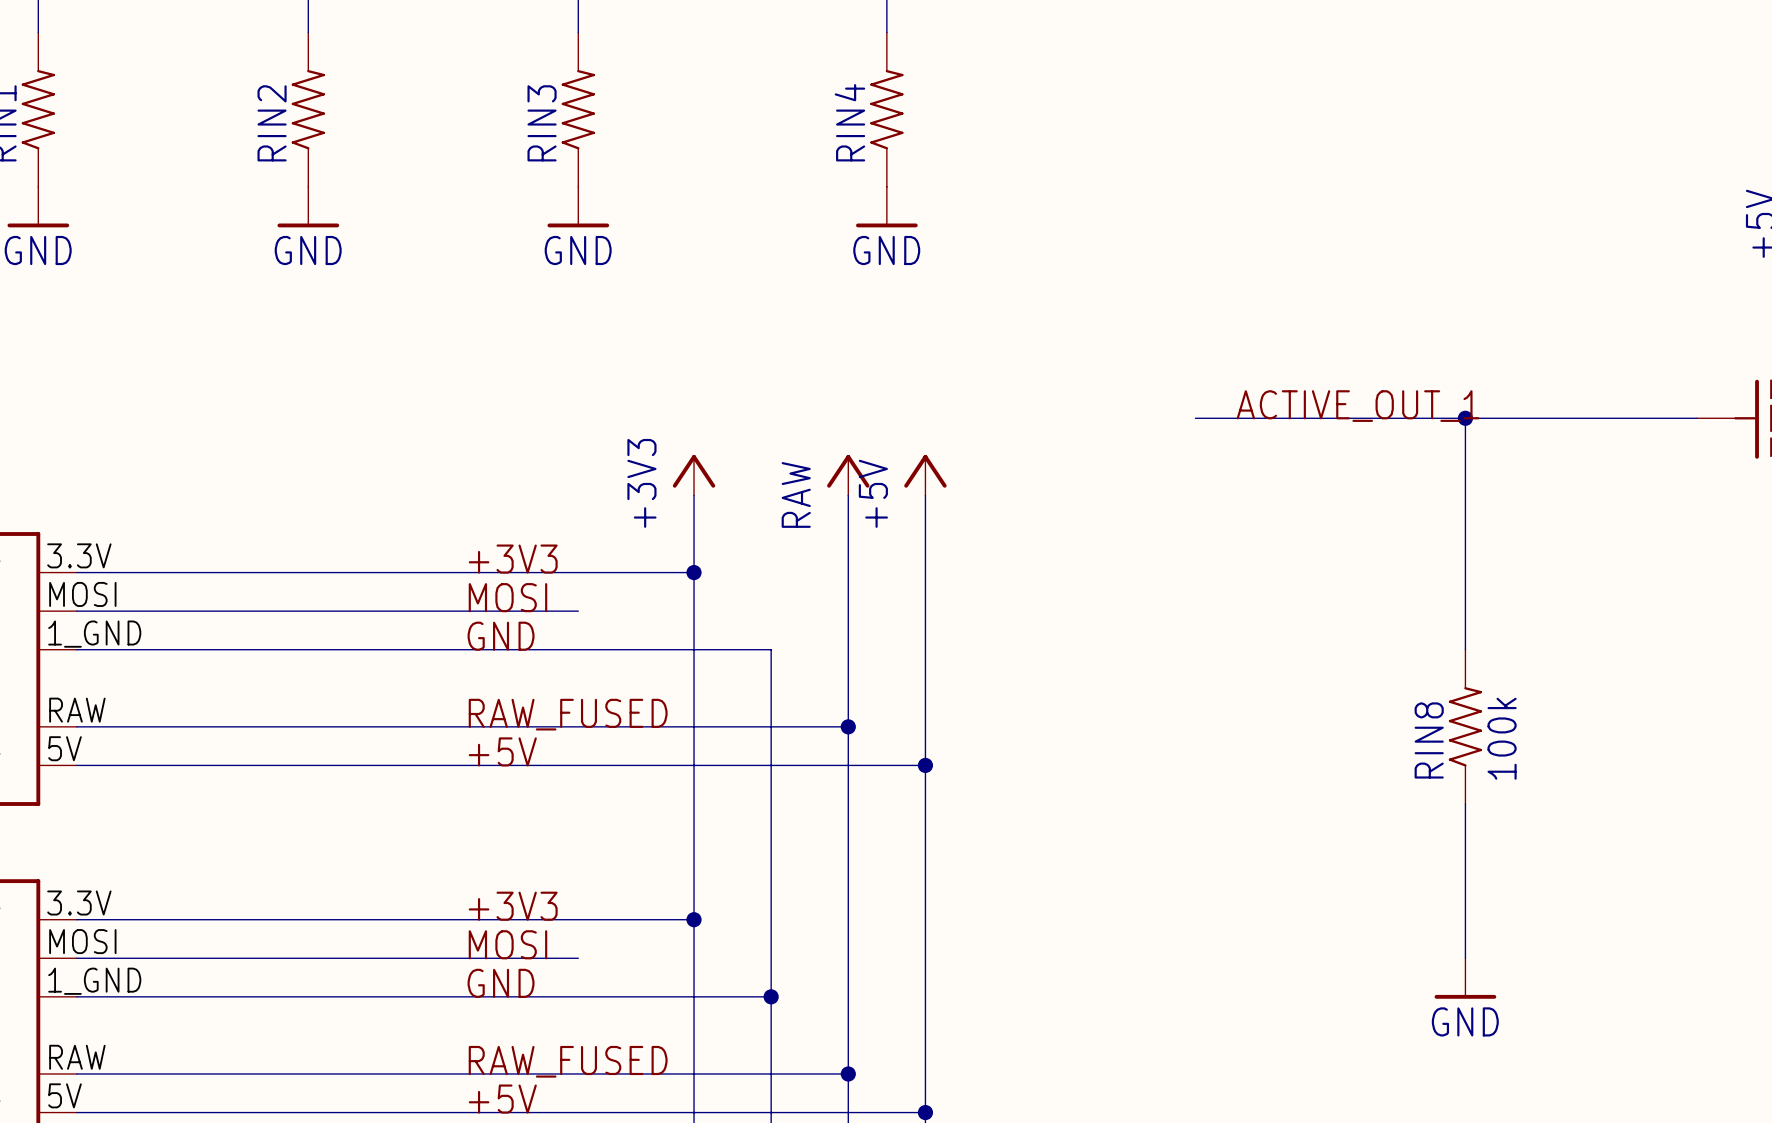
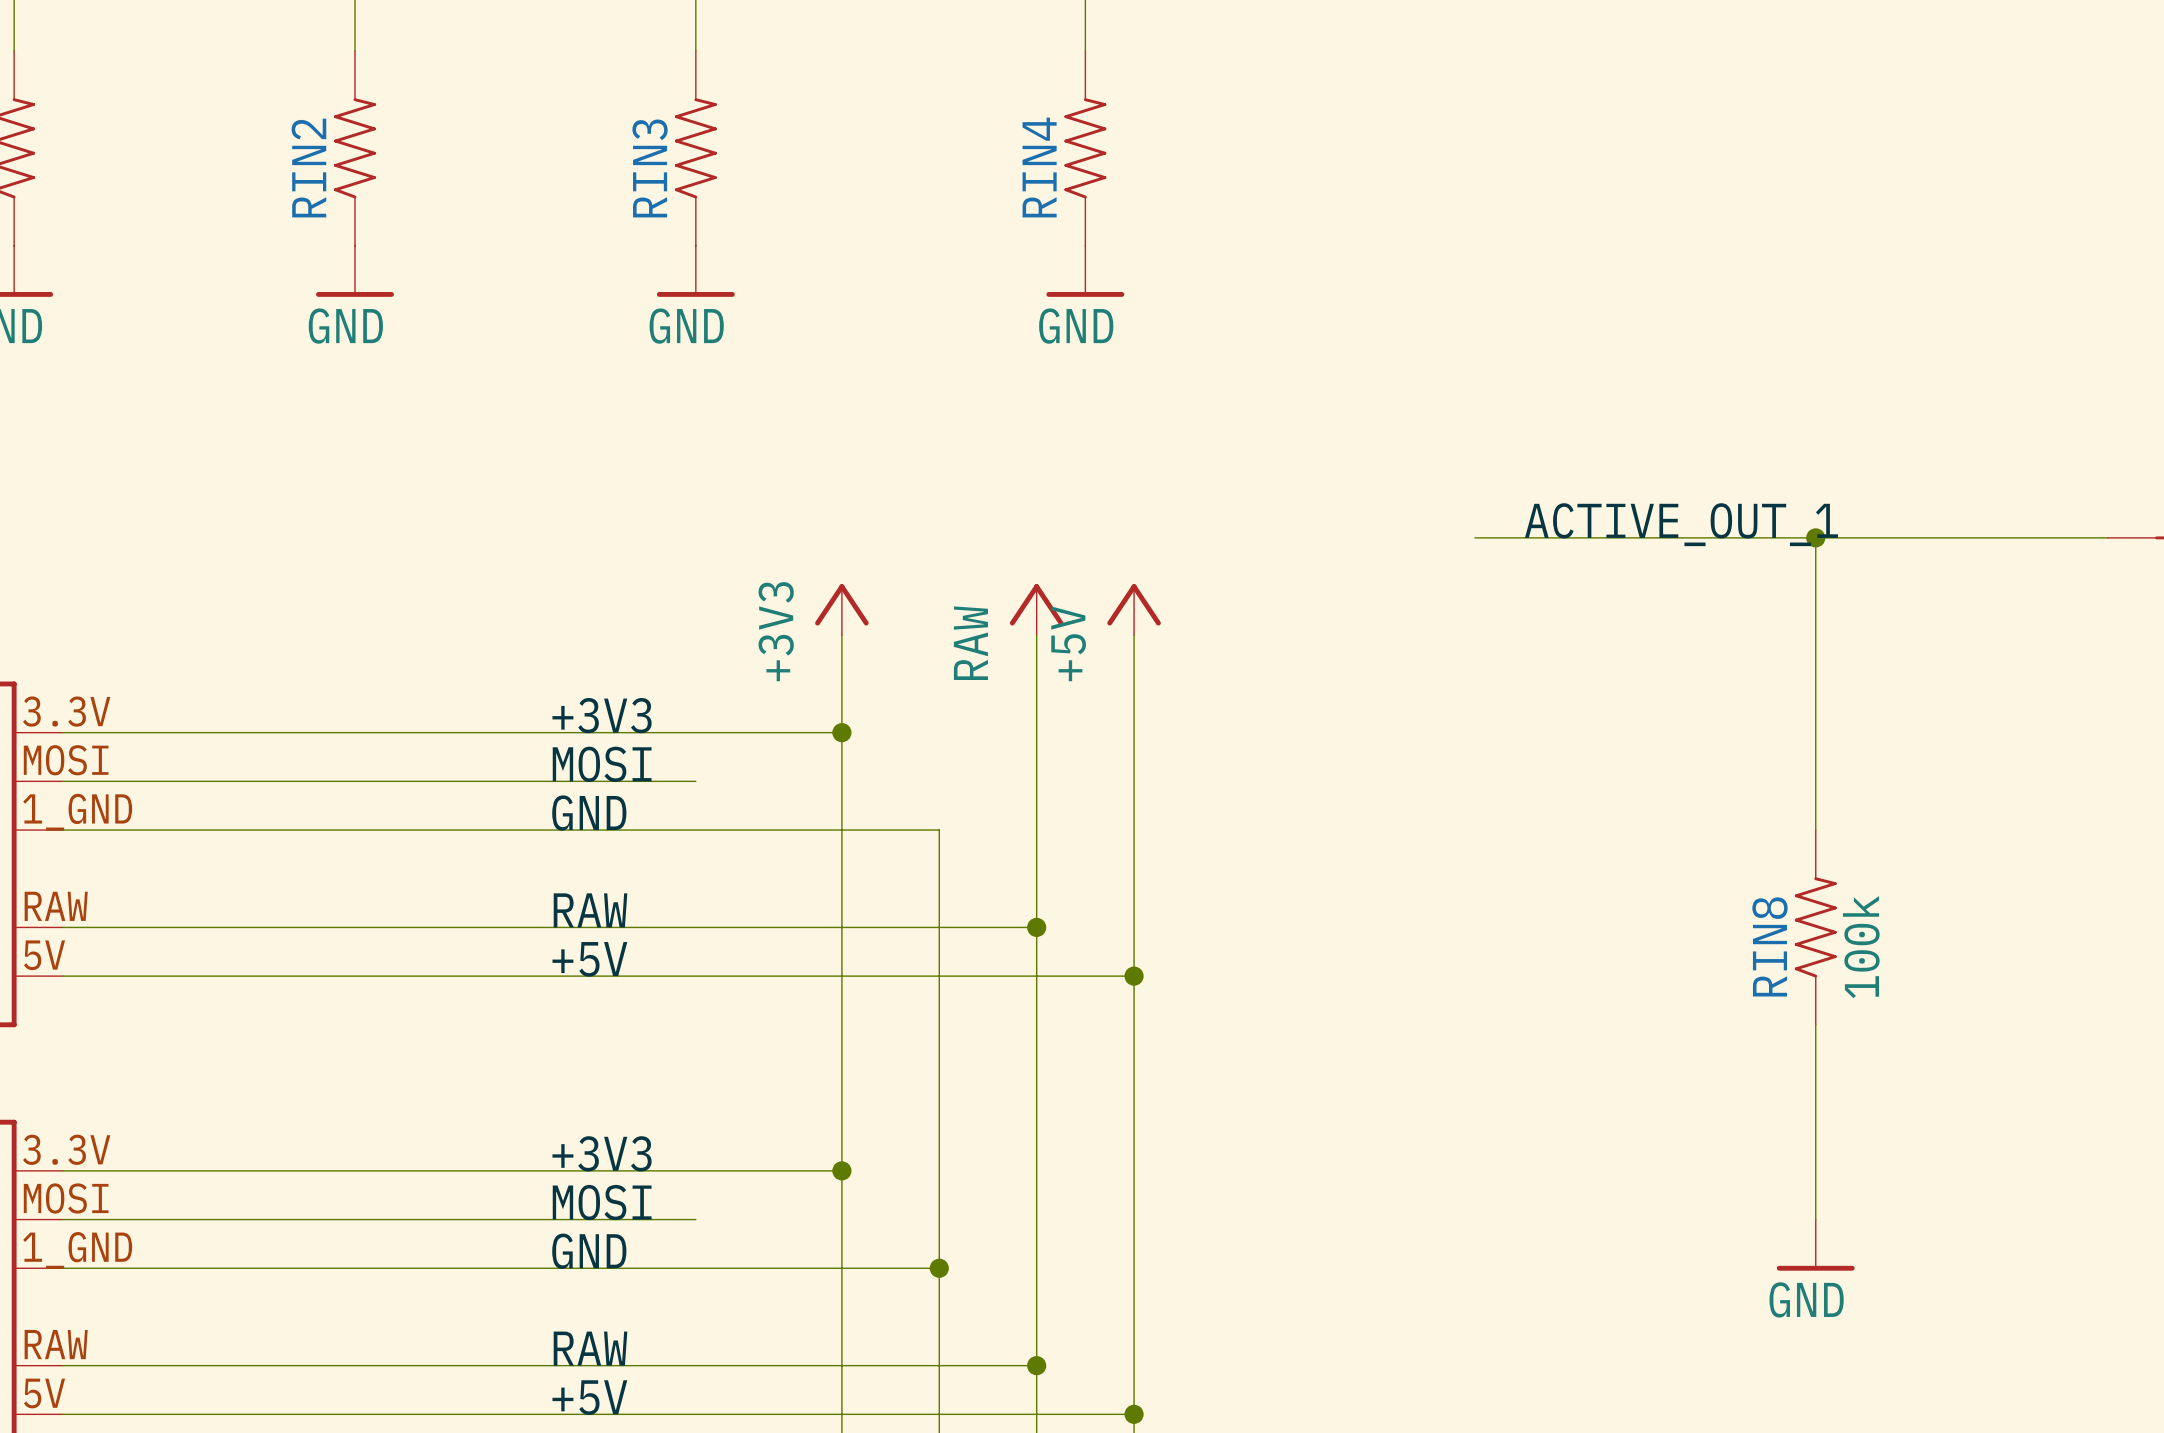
label: RAW_FUSED (568, 714) -> RAW (590, 910)
label: RAW_FUSED (568, 1061) -> RAW (590, 1348)

